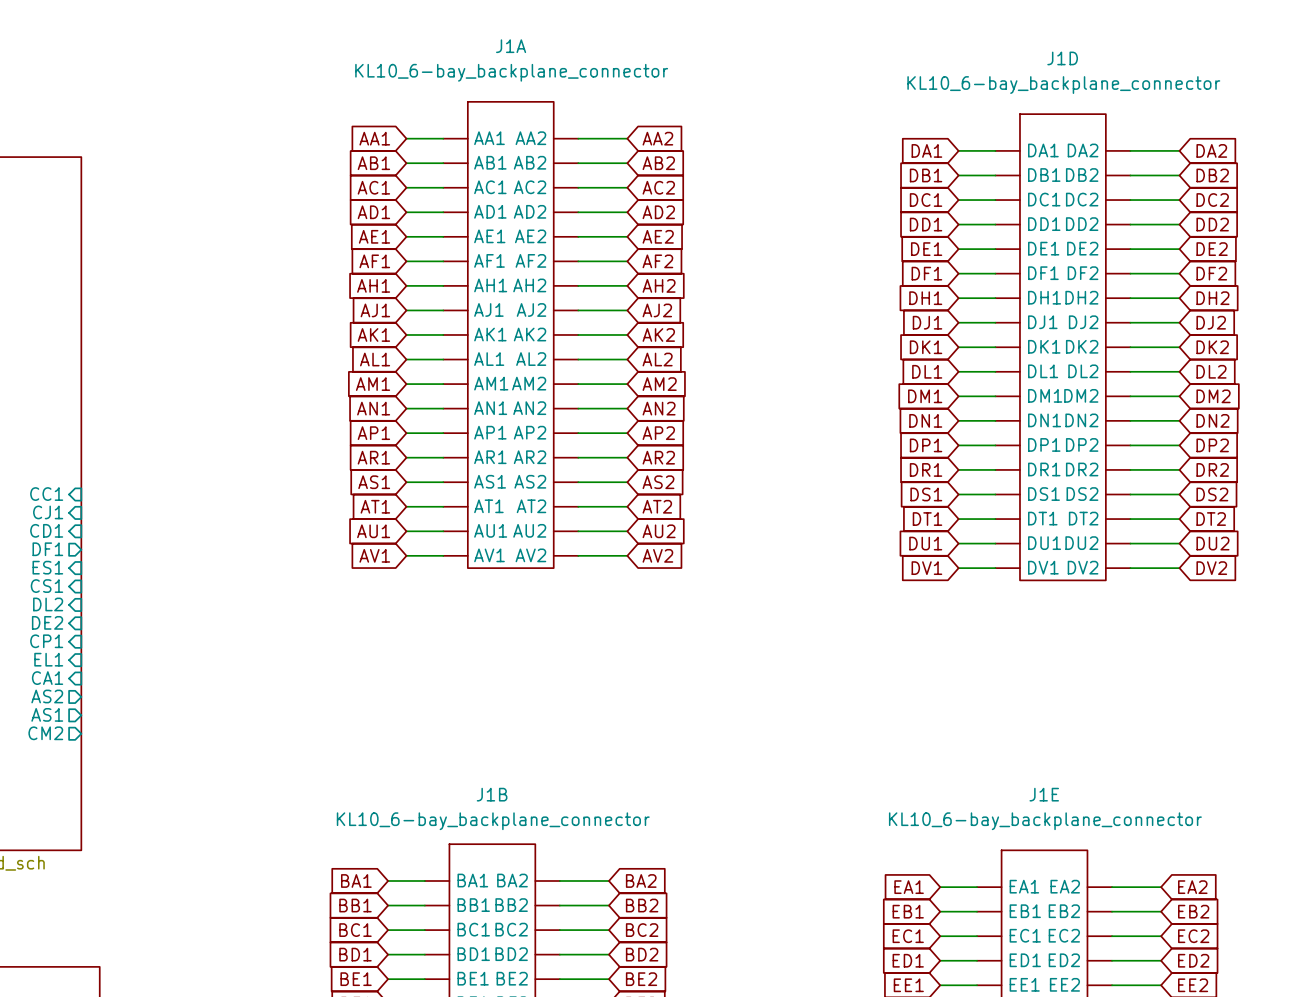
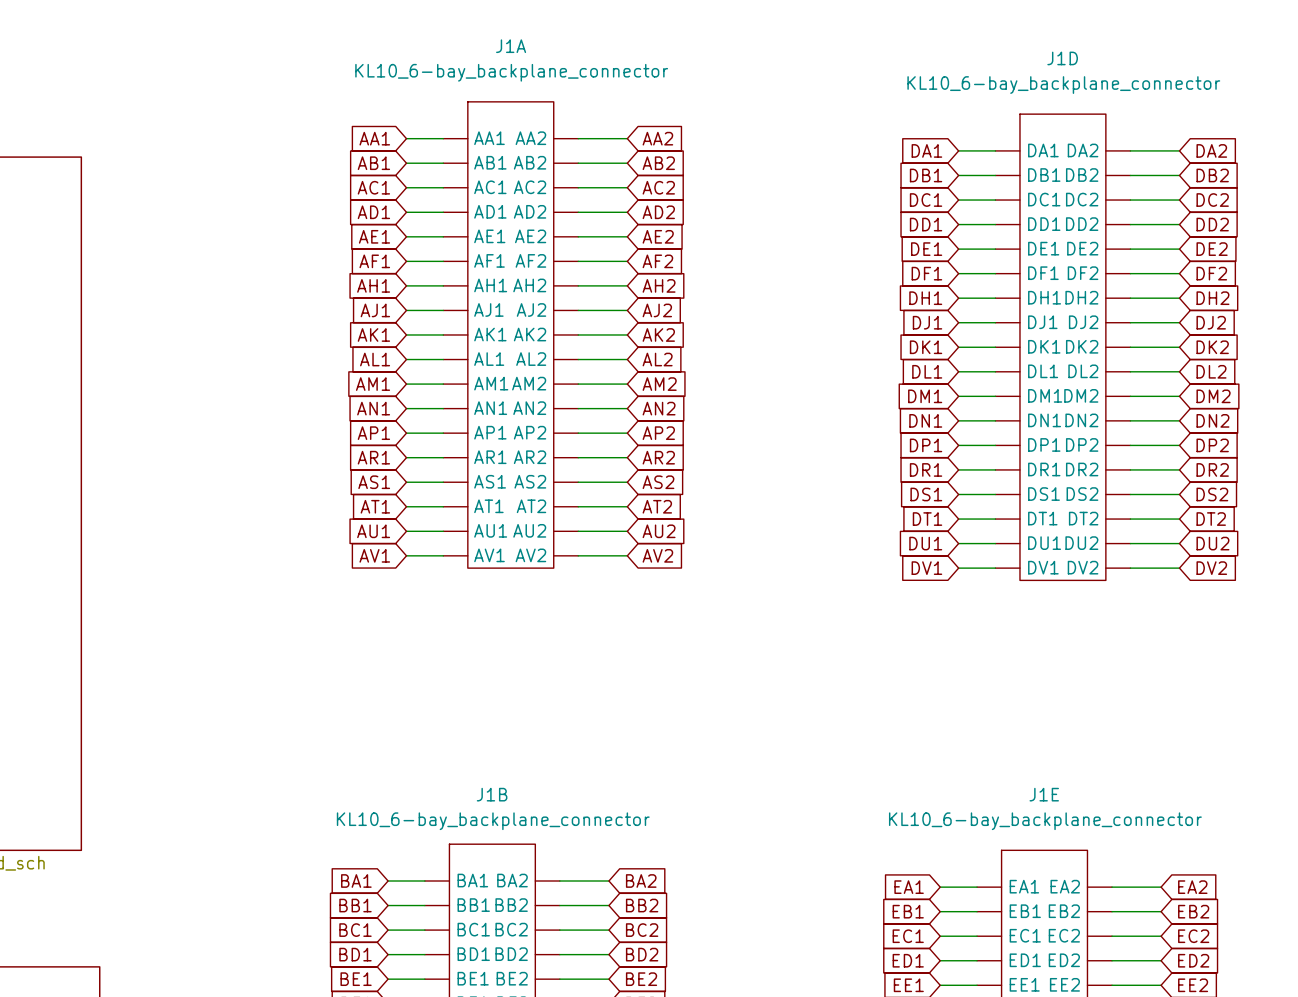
sheet pin: CC1 (46, 494) -> none
sheet pin: CJ1 (48, 512) -> none
sheet pin: CD1 (46, 530) -> none
sheet pin: DF1 (47, 549) -> none
sheet pin: ES1 (47, 567) -> none
sheet pin: CS1 (46, 586) -> none
sheet pin: DL2 (48, 604) -> none
sheet pin: DE2 (47, 622) -> none
sheet pin: CP1 (46, 641) -> none
sheet pin: EL1 (48, 659) -> none
sheet pin: CA1 (47, 678) -> none
sheet pin: AS2 (47, 696) -> none
sheet pin: AS1 (47, 714) -> none
sheet pin: CM2 (45, 733) -> none

